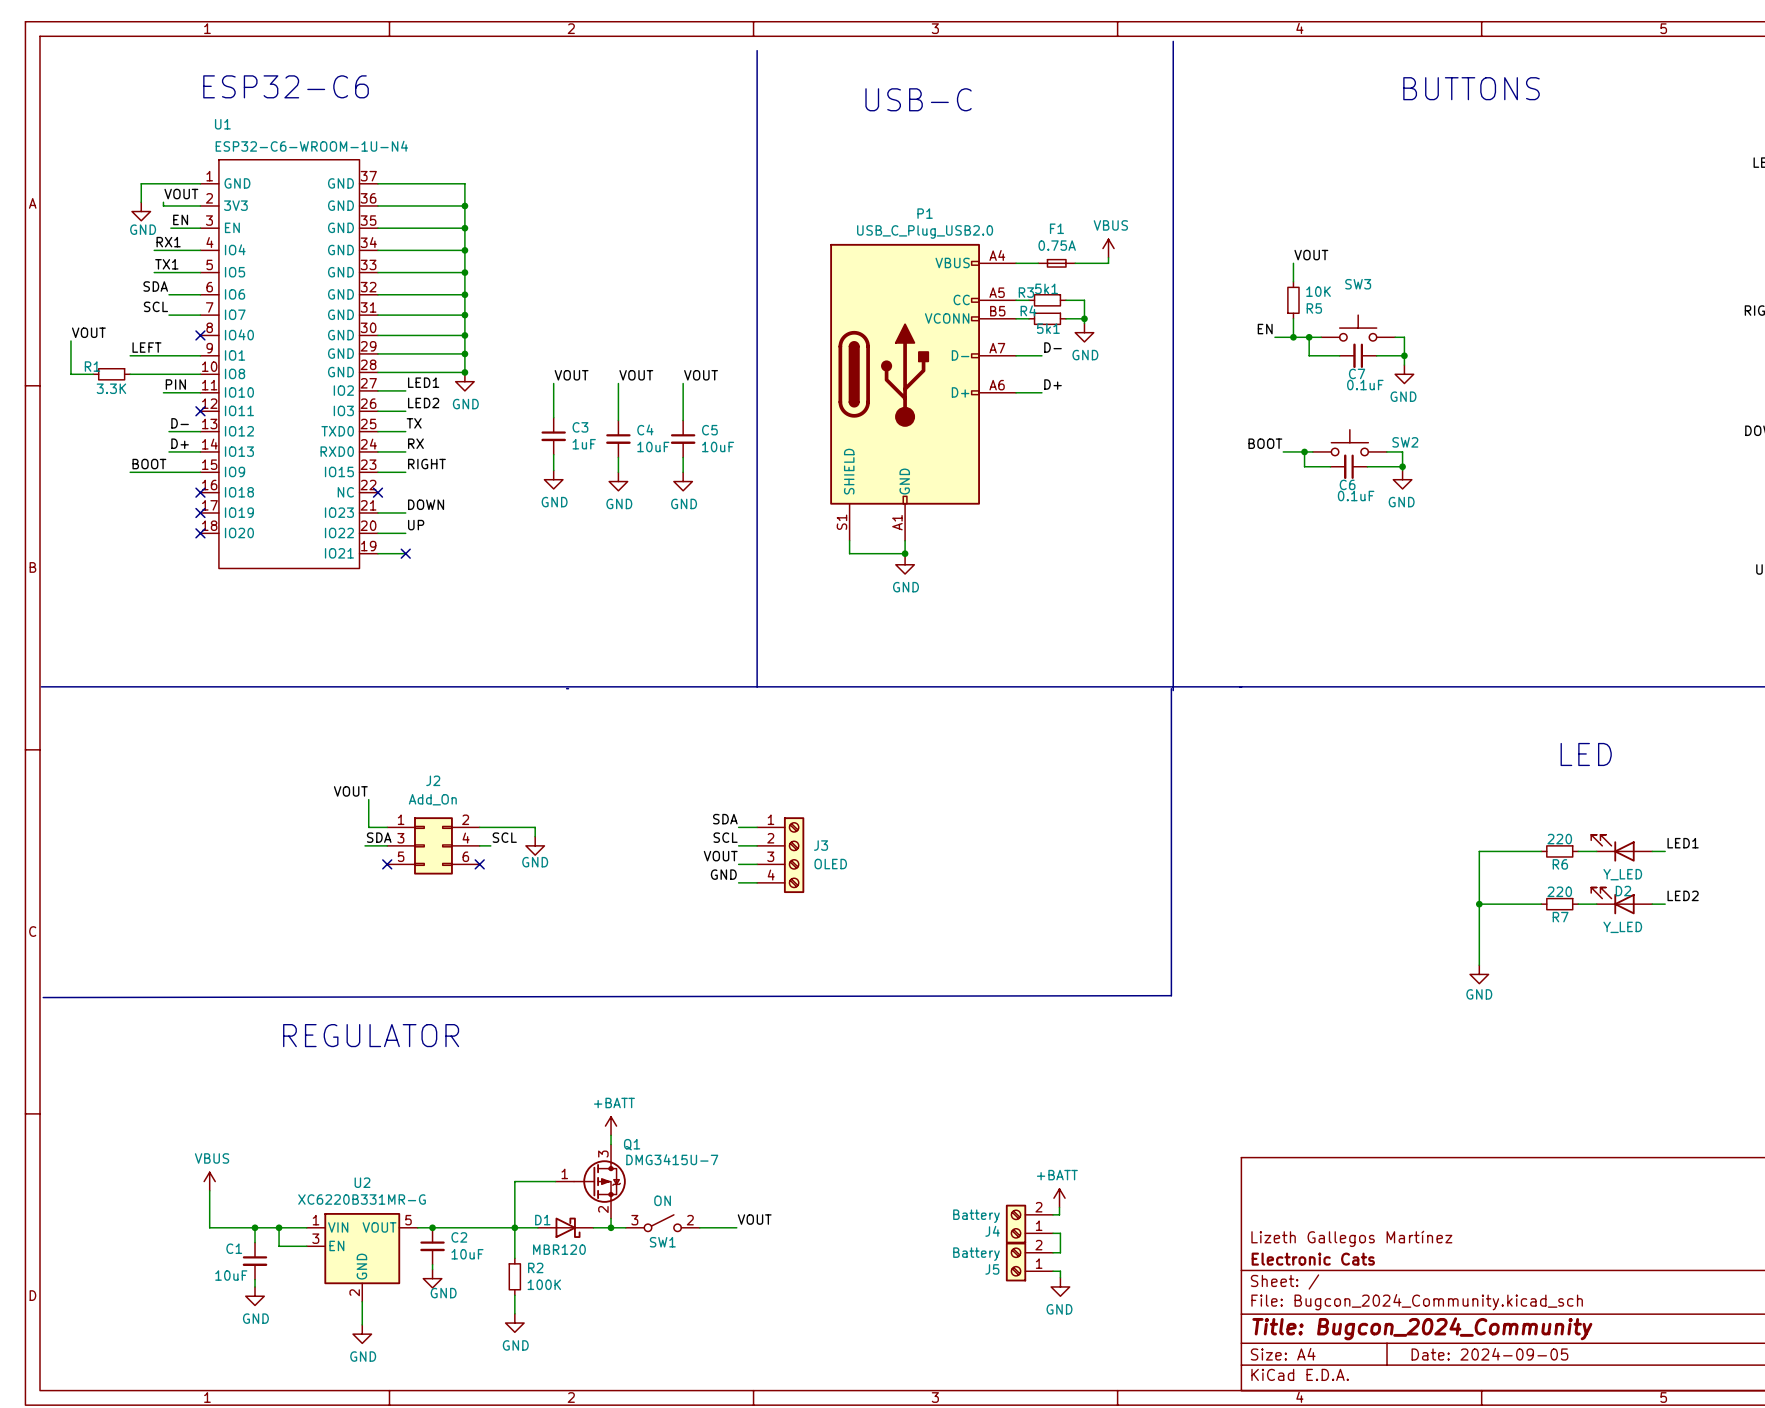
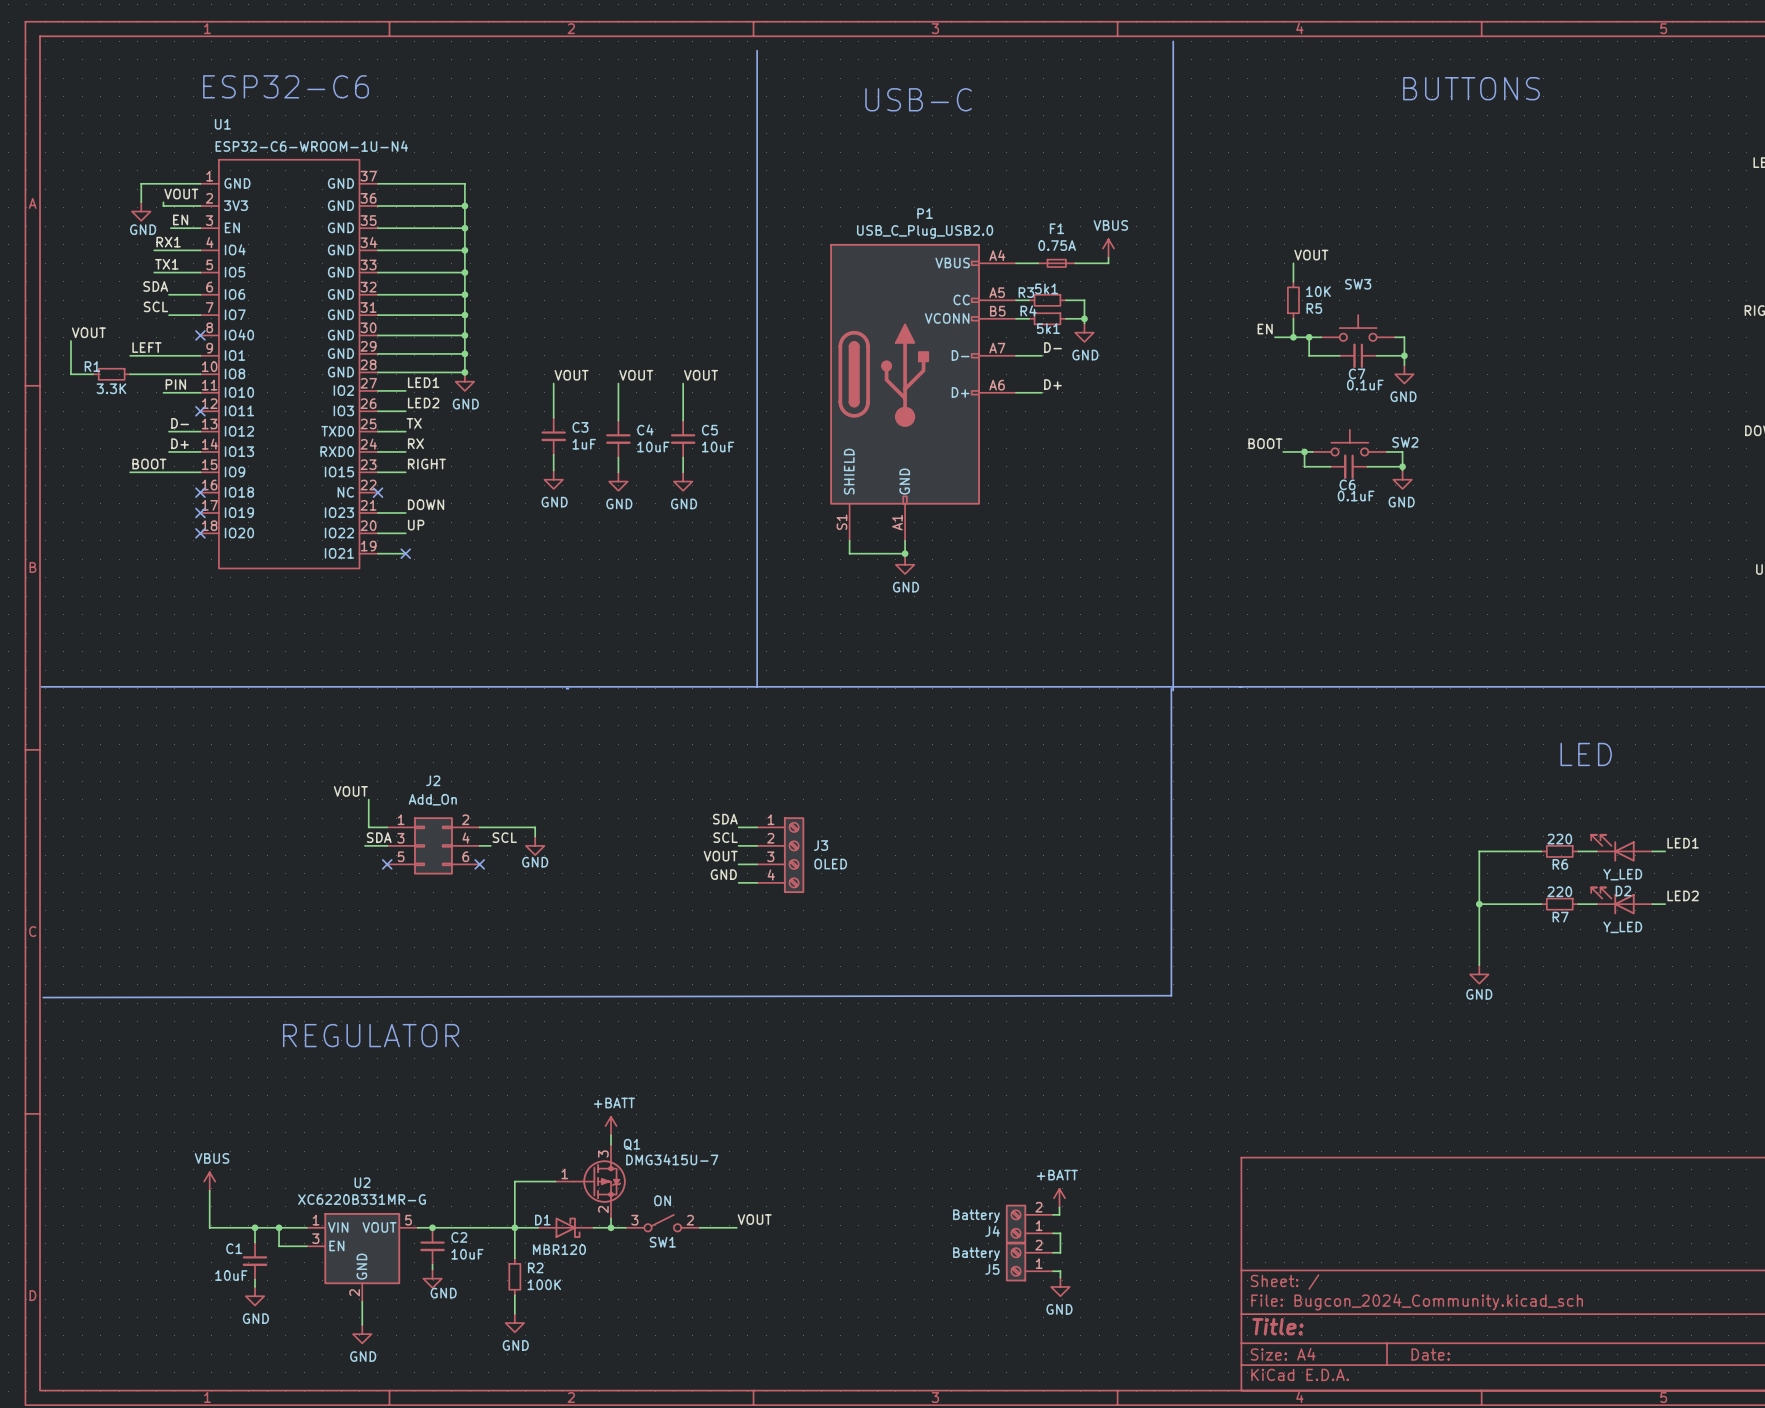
title block: Lizeth Gallegos Martínez (1351, 1238) -> none
title block: Electronic Cats (1313, 1259) -> none
title block: Title: Bugcon_2024_Community (1422, 1328) -> Title: (1278, 1326)
title block: Date: 2024-09-05 (1489, 1354) -> Date: (1430, 1354)

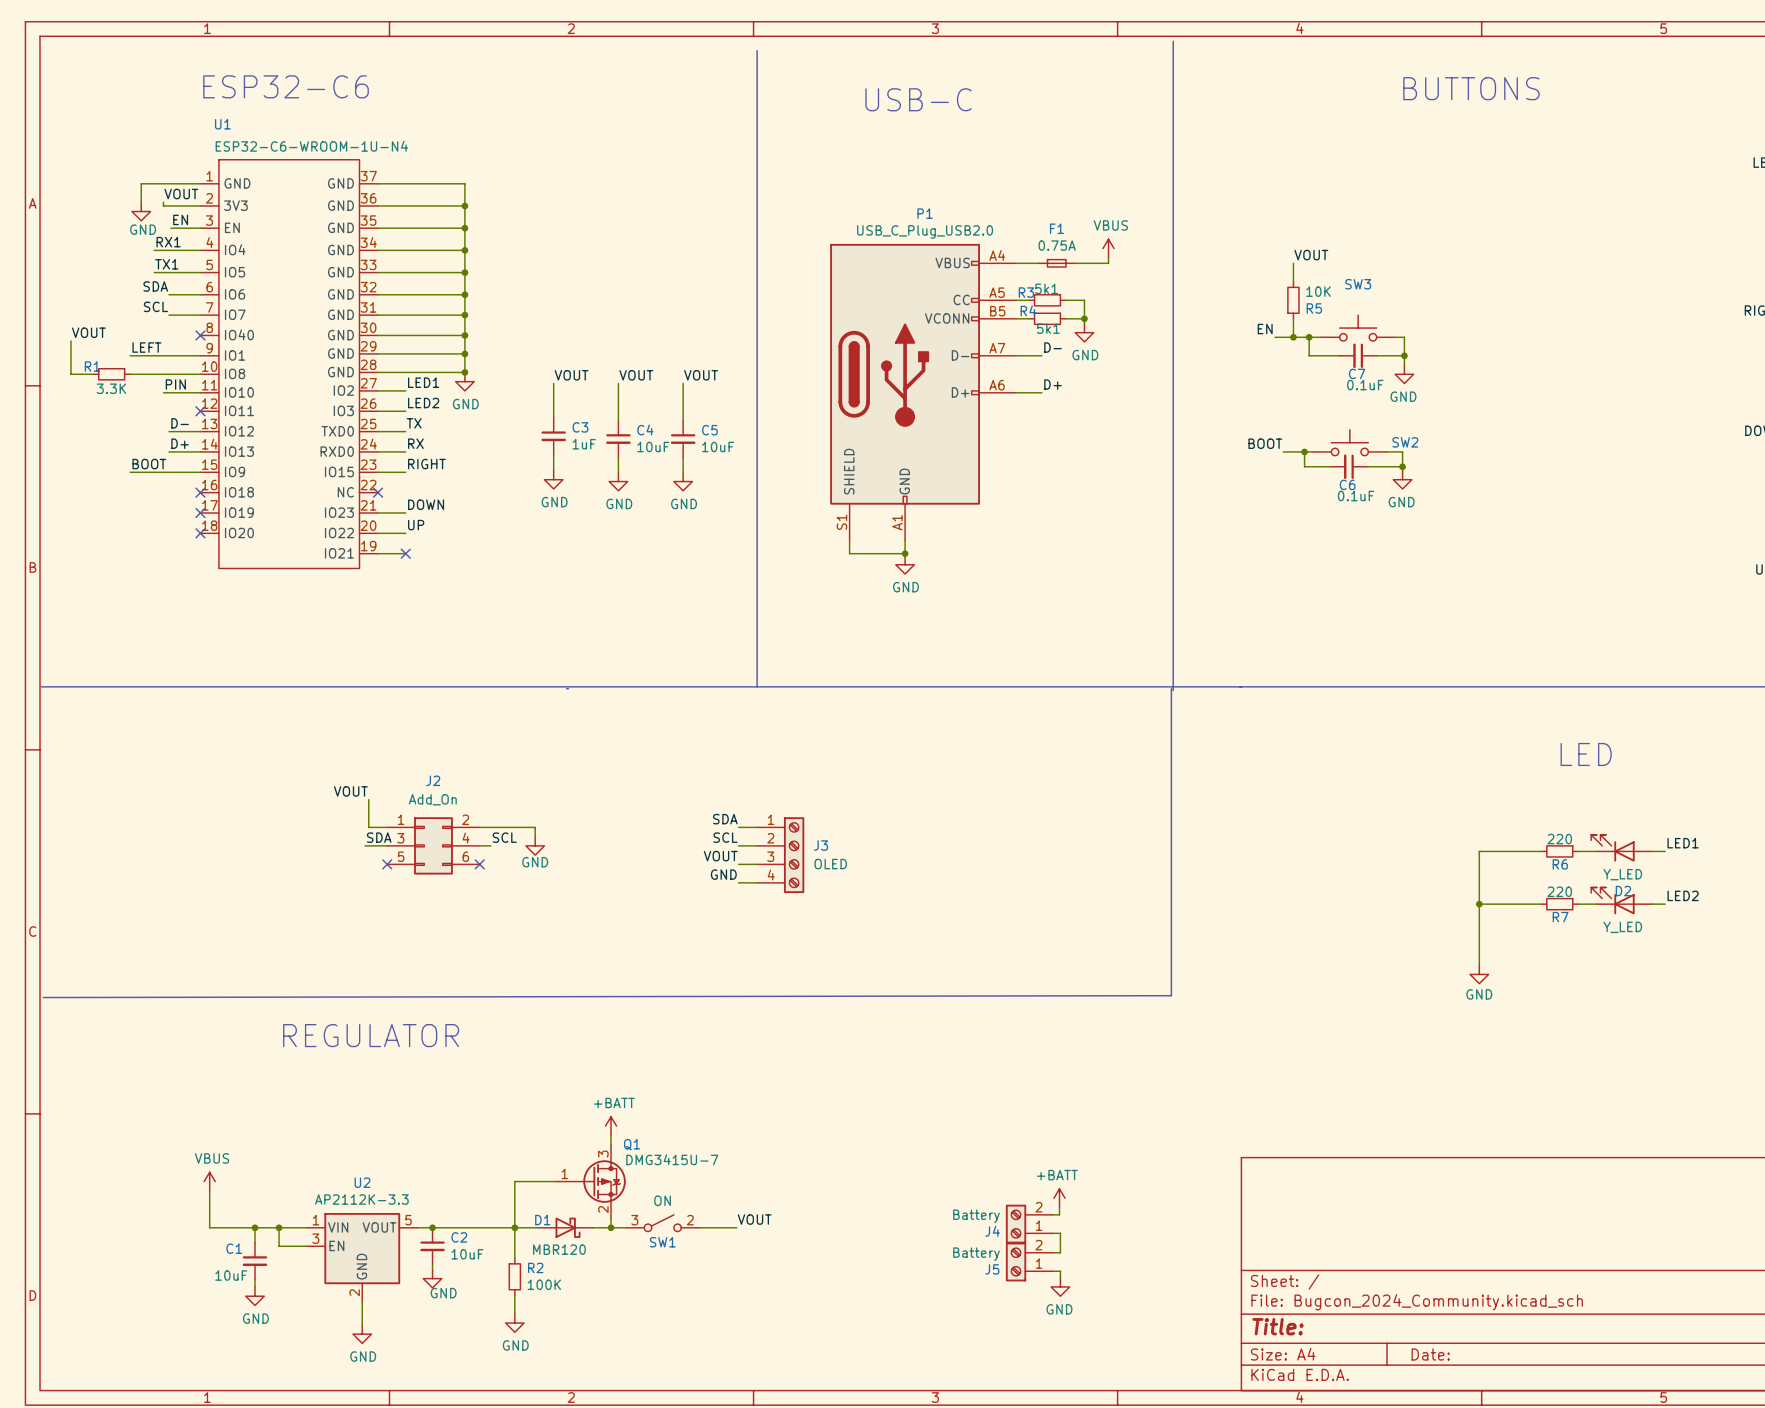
U2 value: XC6220B331MR-G (362, 1199) -> AP2112K-3.3 (361, 1199)

